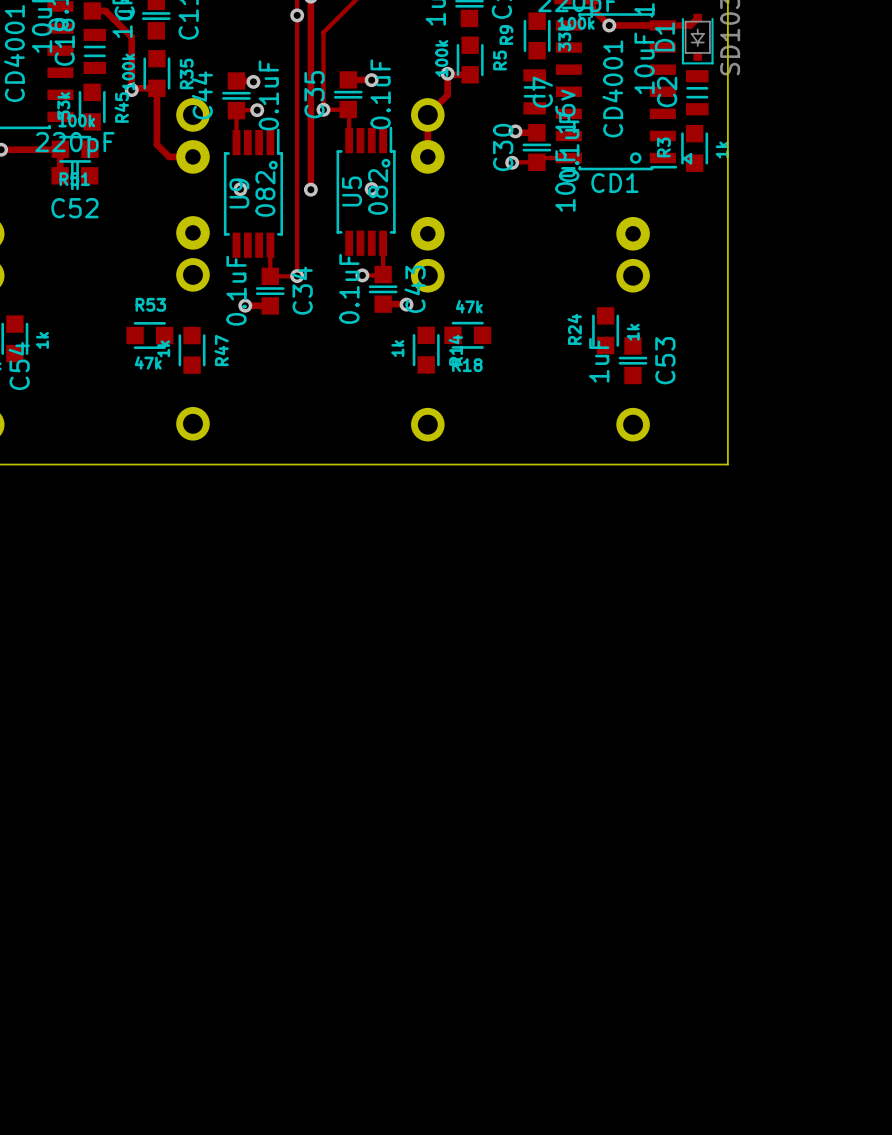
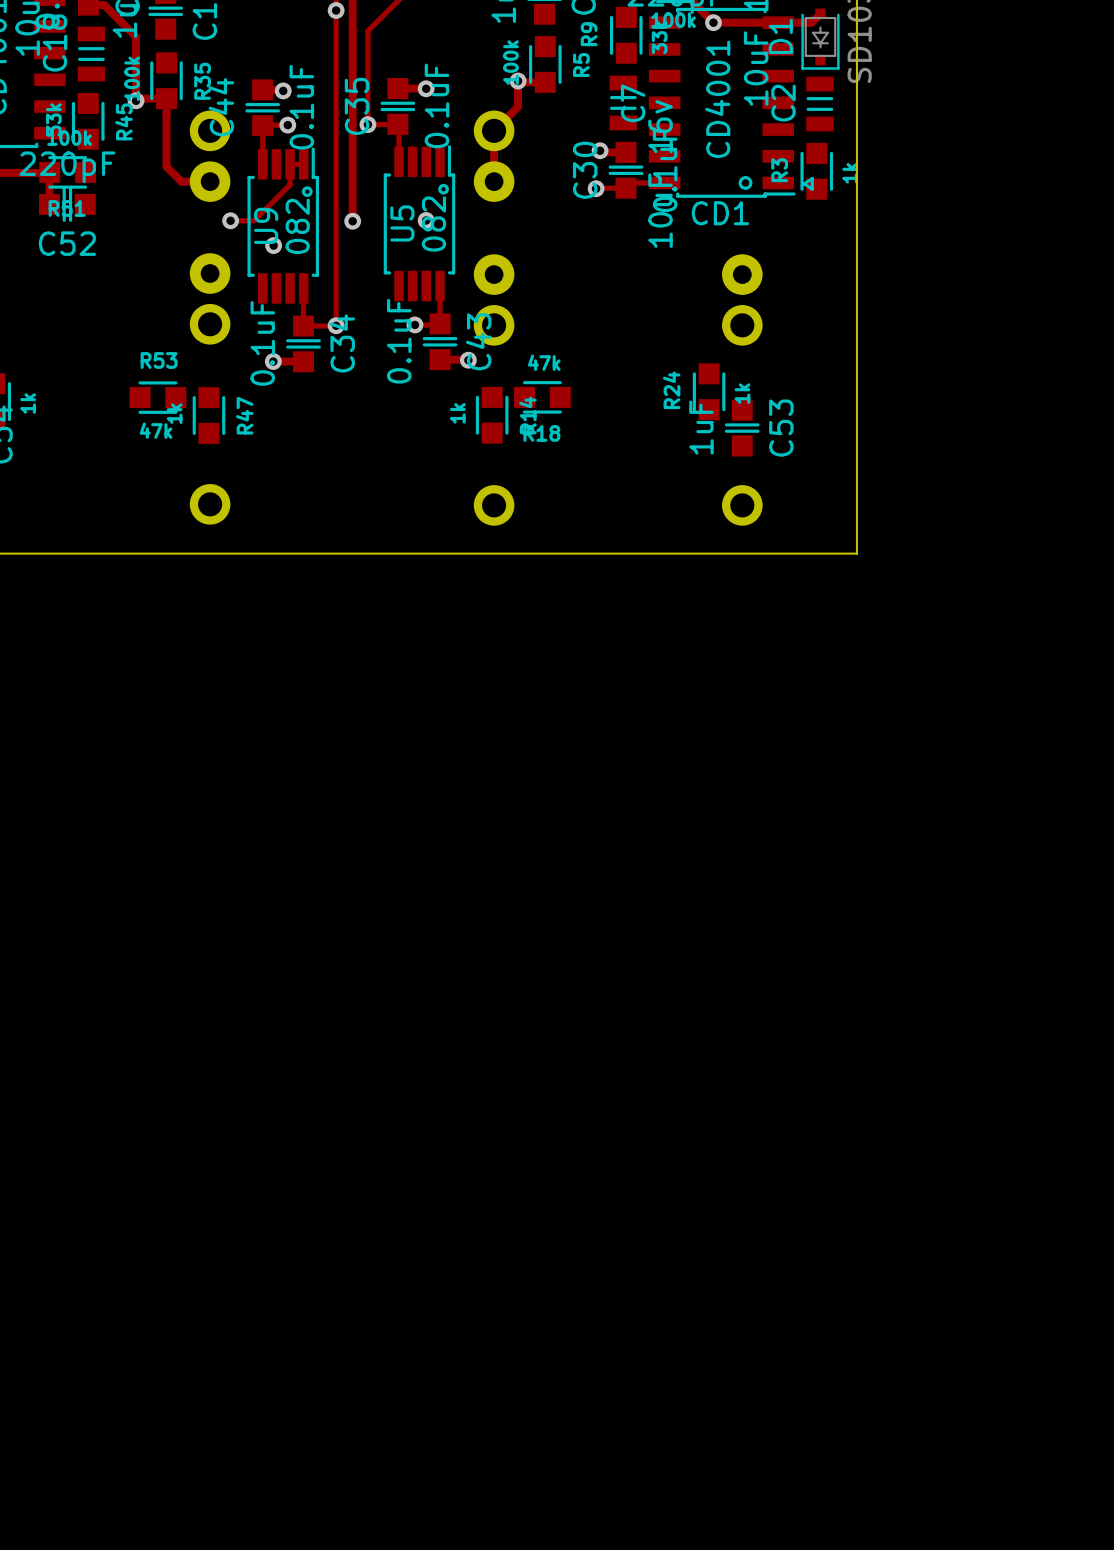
track: none -> (303, 164) (290, 164) (290, 184) (254, 220) (230, 220)
via: none -> (230, 220)
via: (240, 189) -> none
via: none -> (273, 245)

